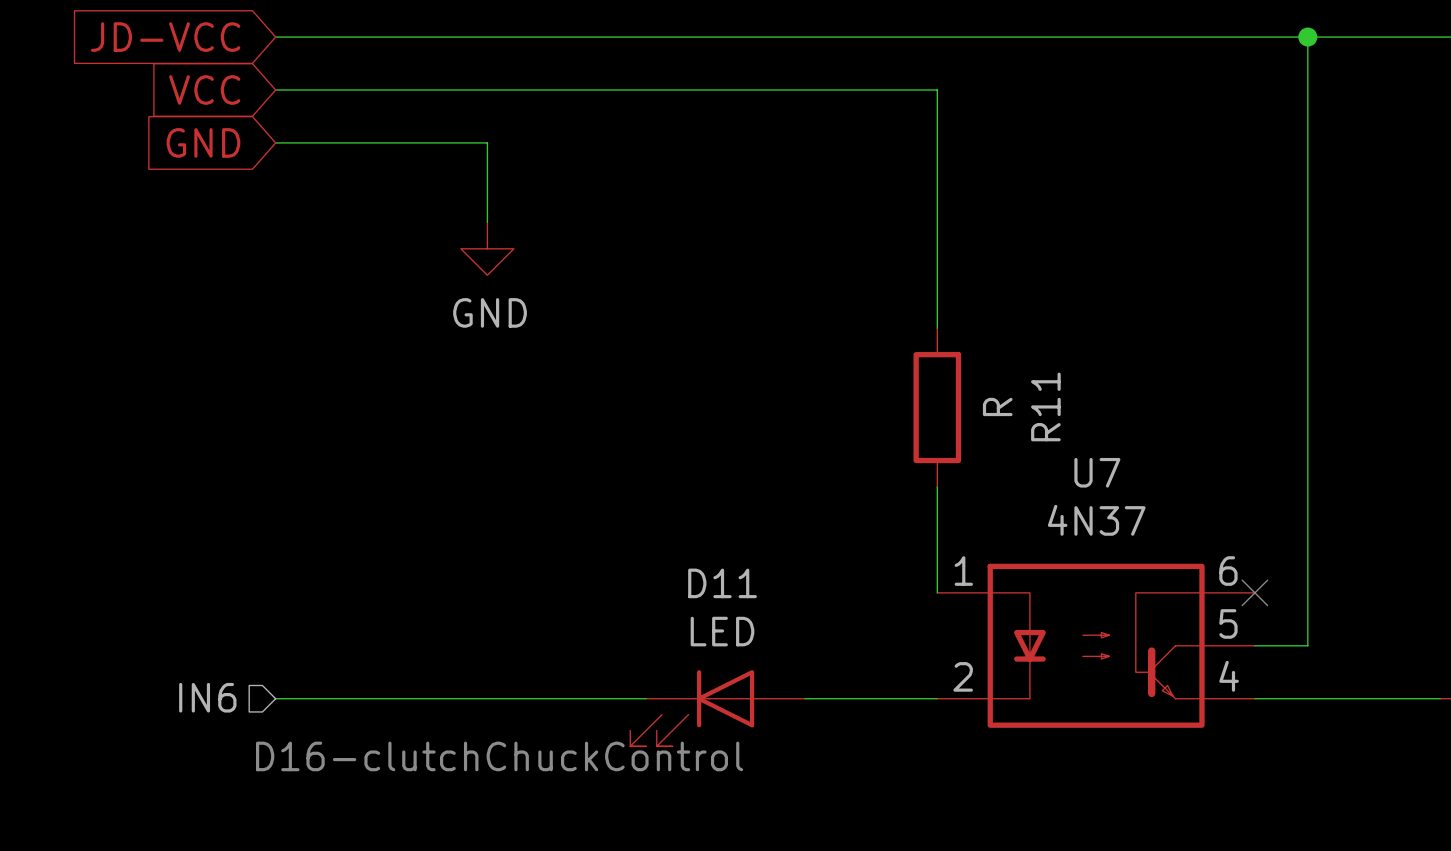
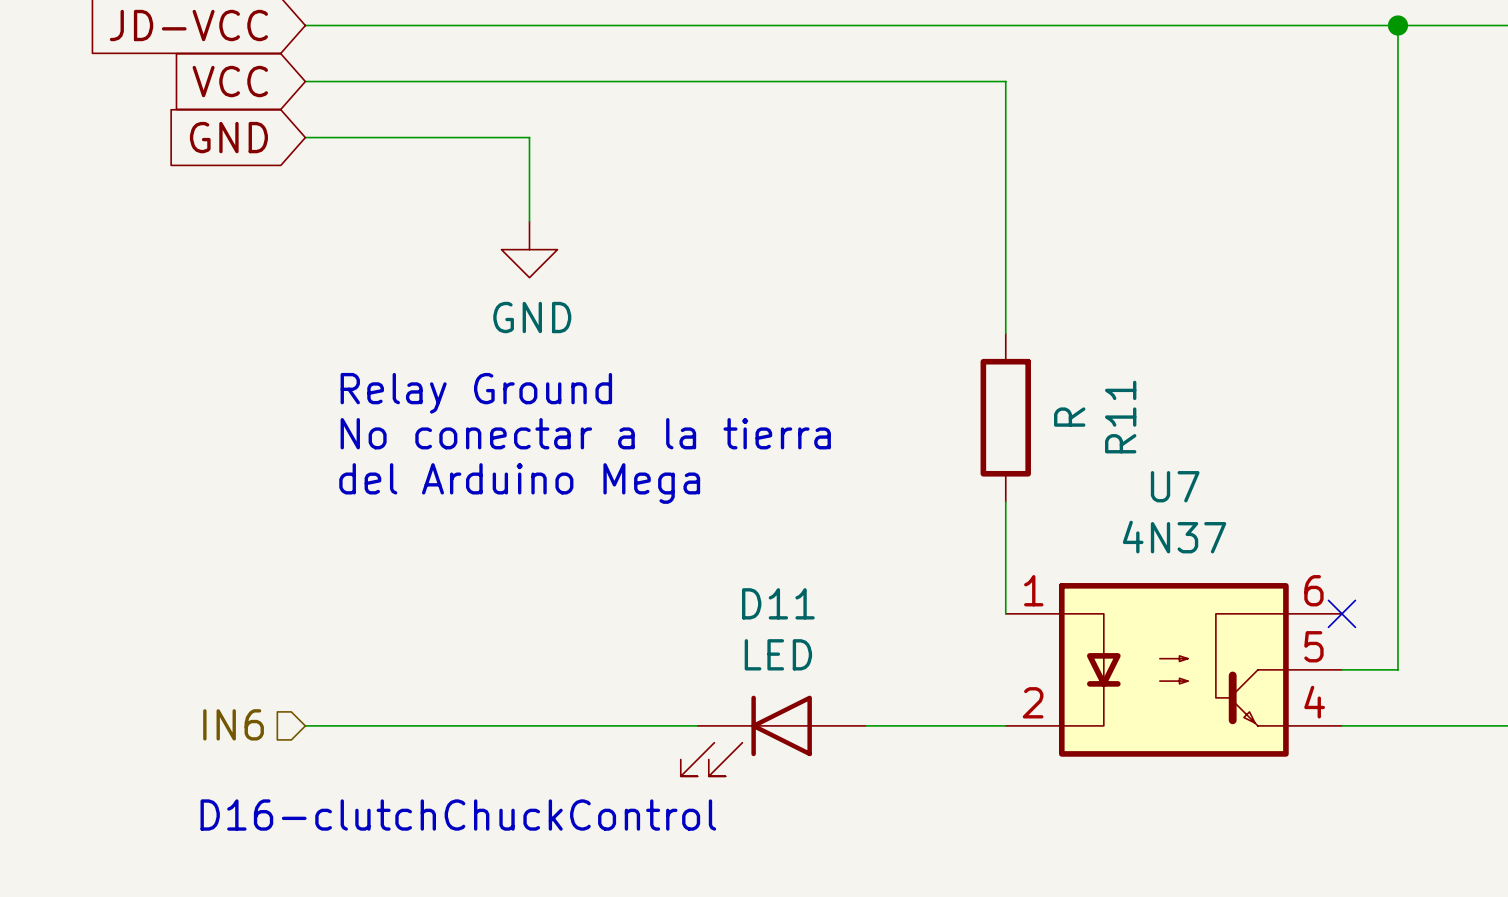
text: none -> Relay Ground (476, 393)
text: none -> No conectar a la tierra (585, 433)
text: none -> del Arduino Mega (519, 483)
text position: D16-clutchChuckControl (499, 756) -> D16-clutchChuckControl (458, 815)

